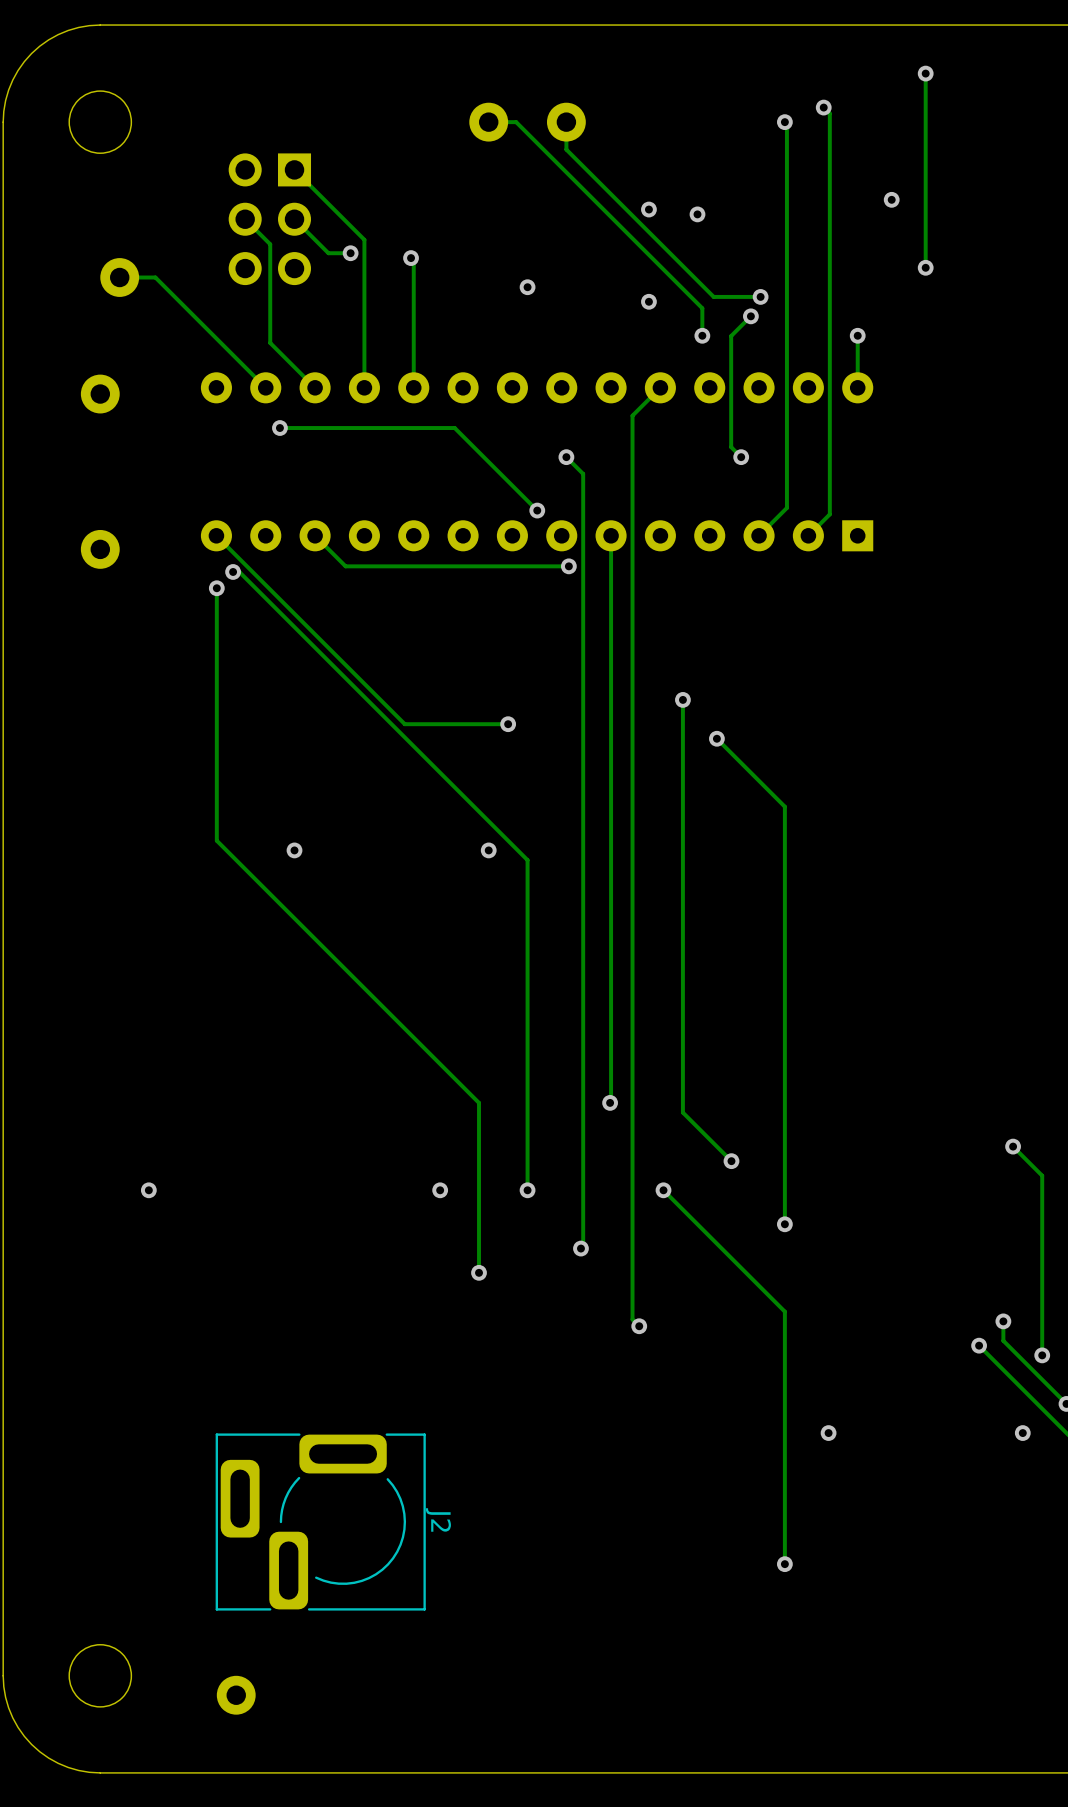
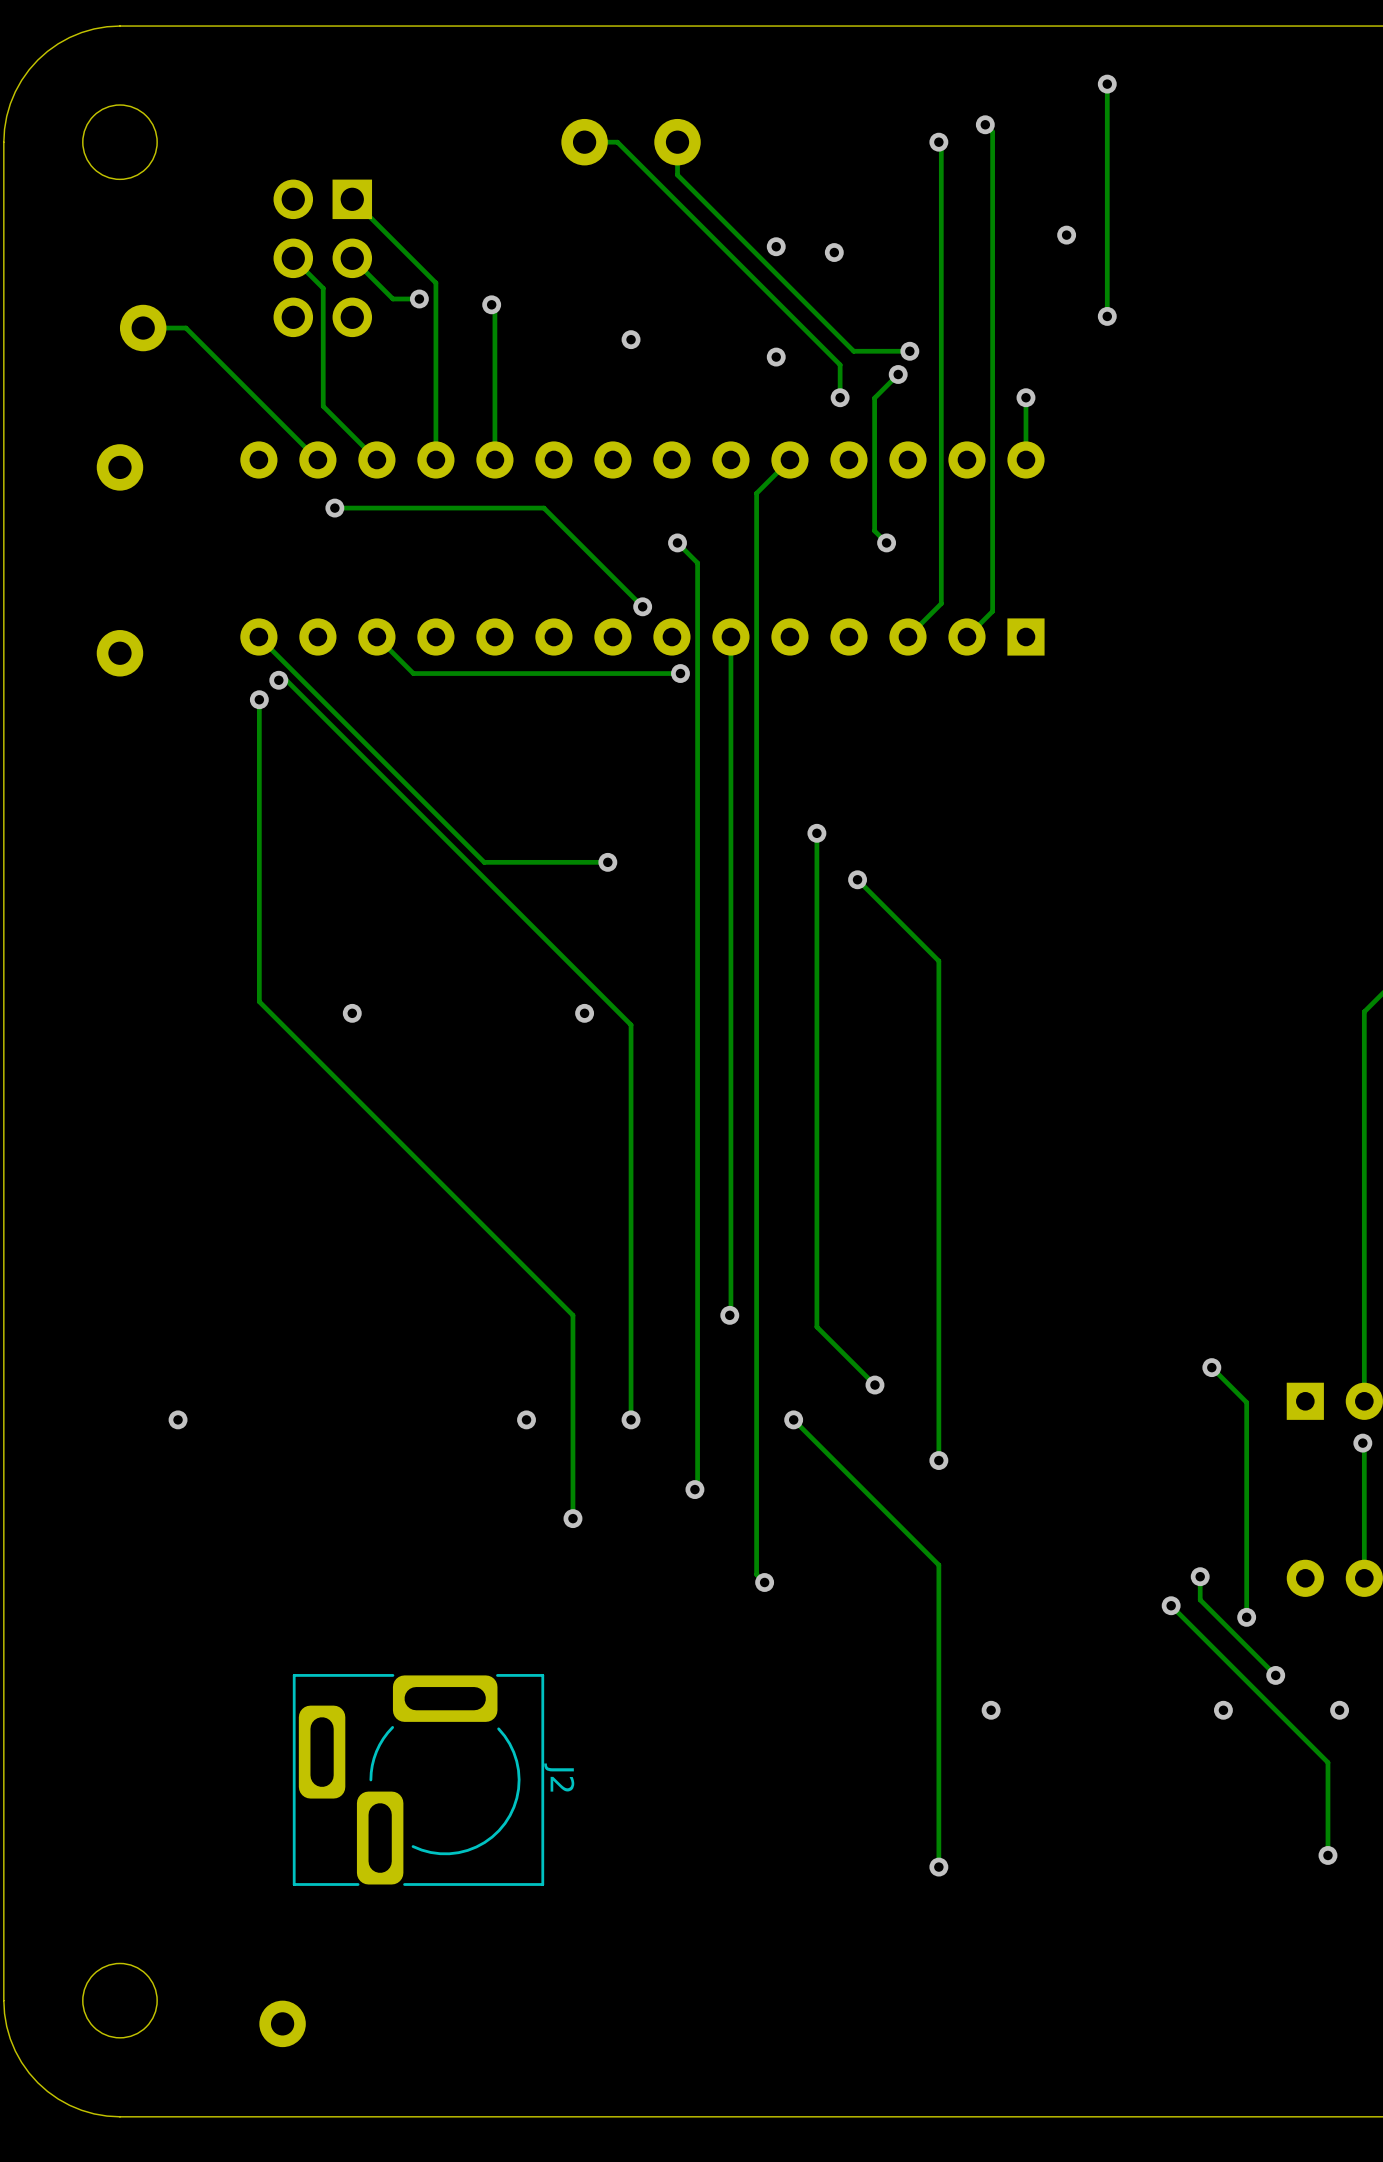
J2 position: (320, 1522) -> (418, 1779)

